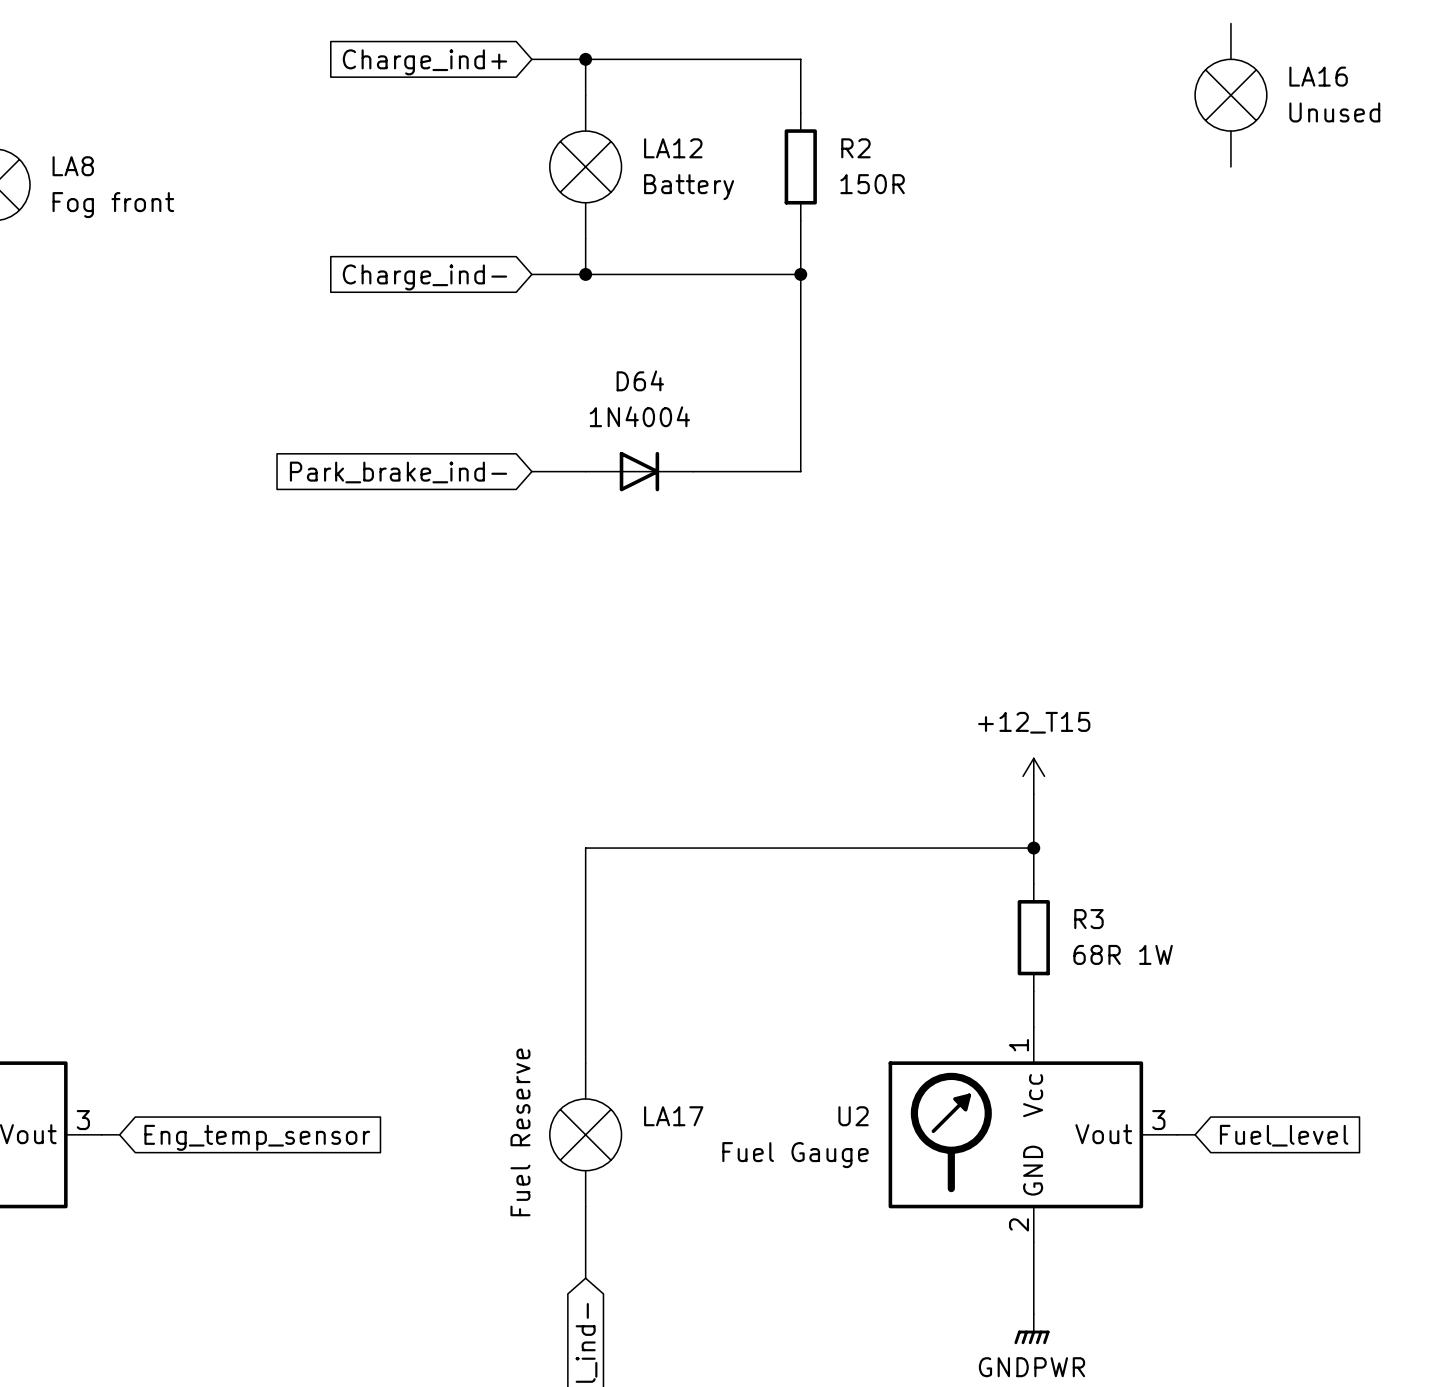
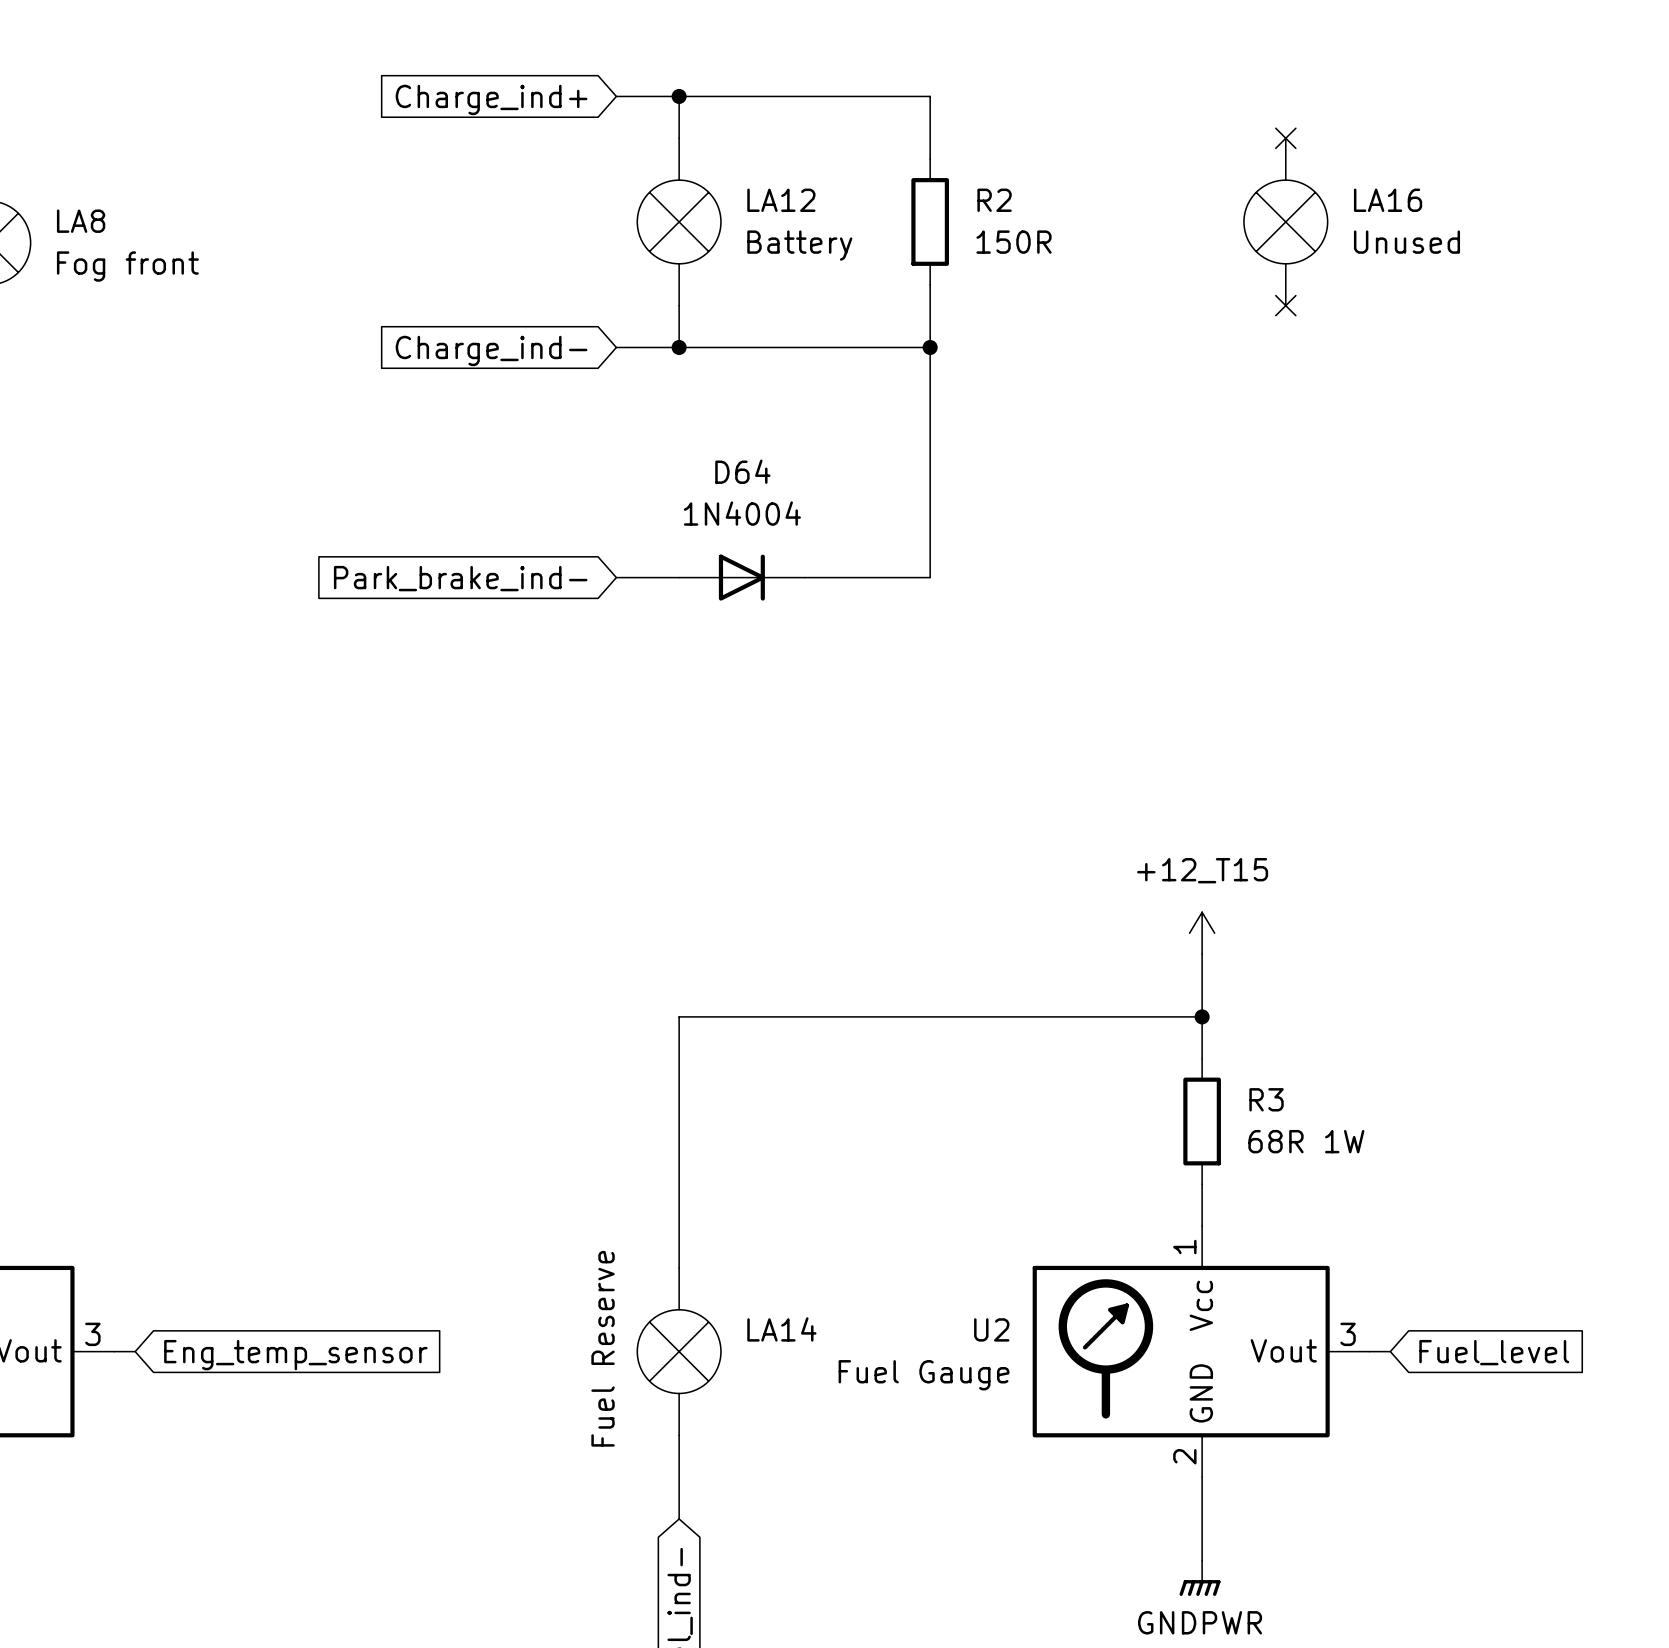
no-connect mark: none -> (1285, 138)
LA16 position: (1230, 95) -> (1285, 221)
no-connect mark: none -> (1285, 305)
LA17 name: LA17 (673, 1116) -> LA14 (781, 1329)

